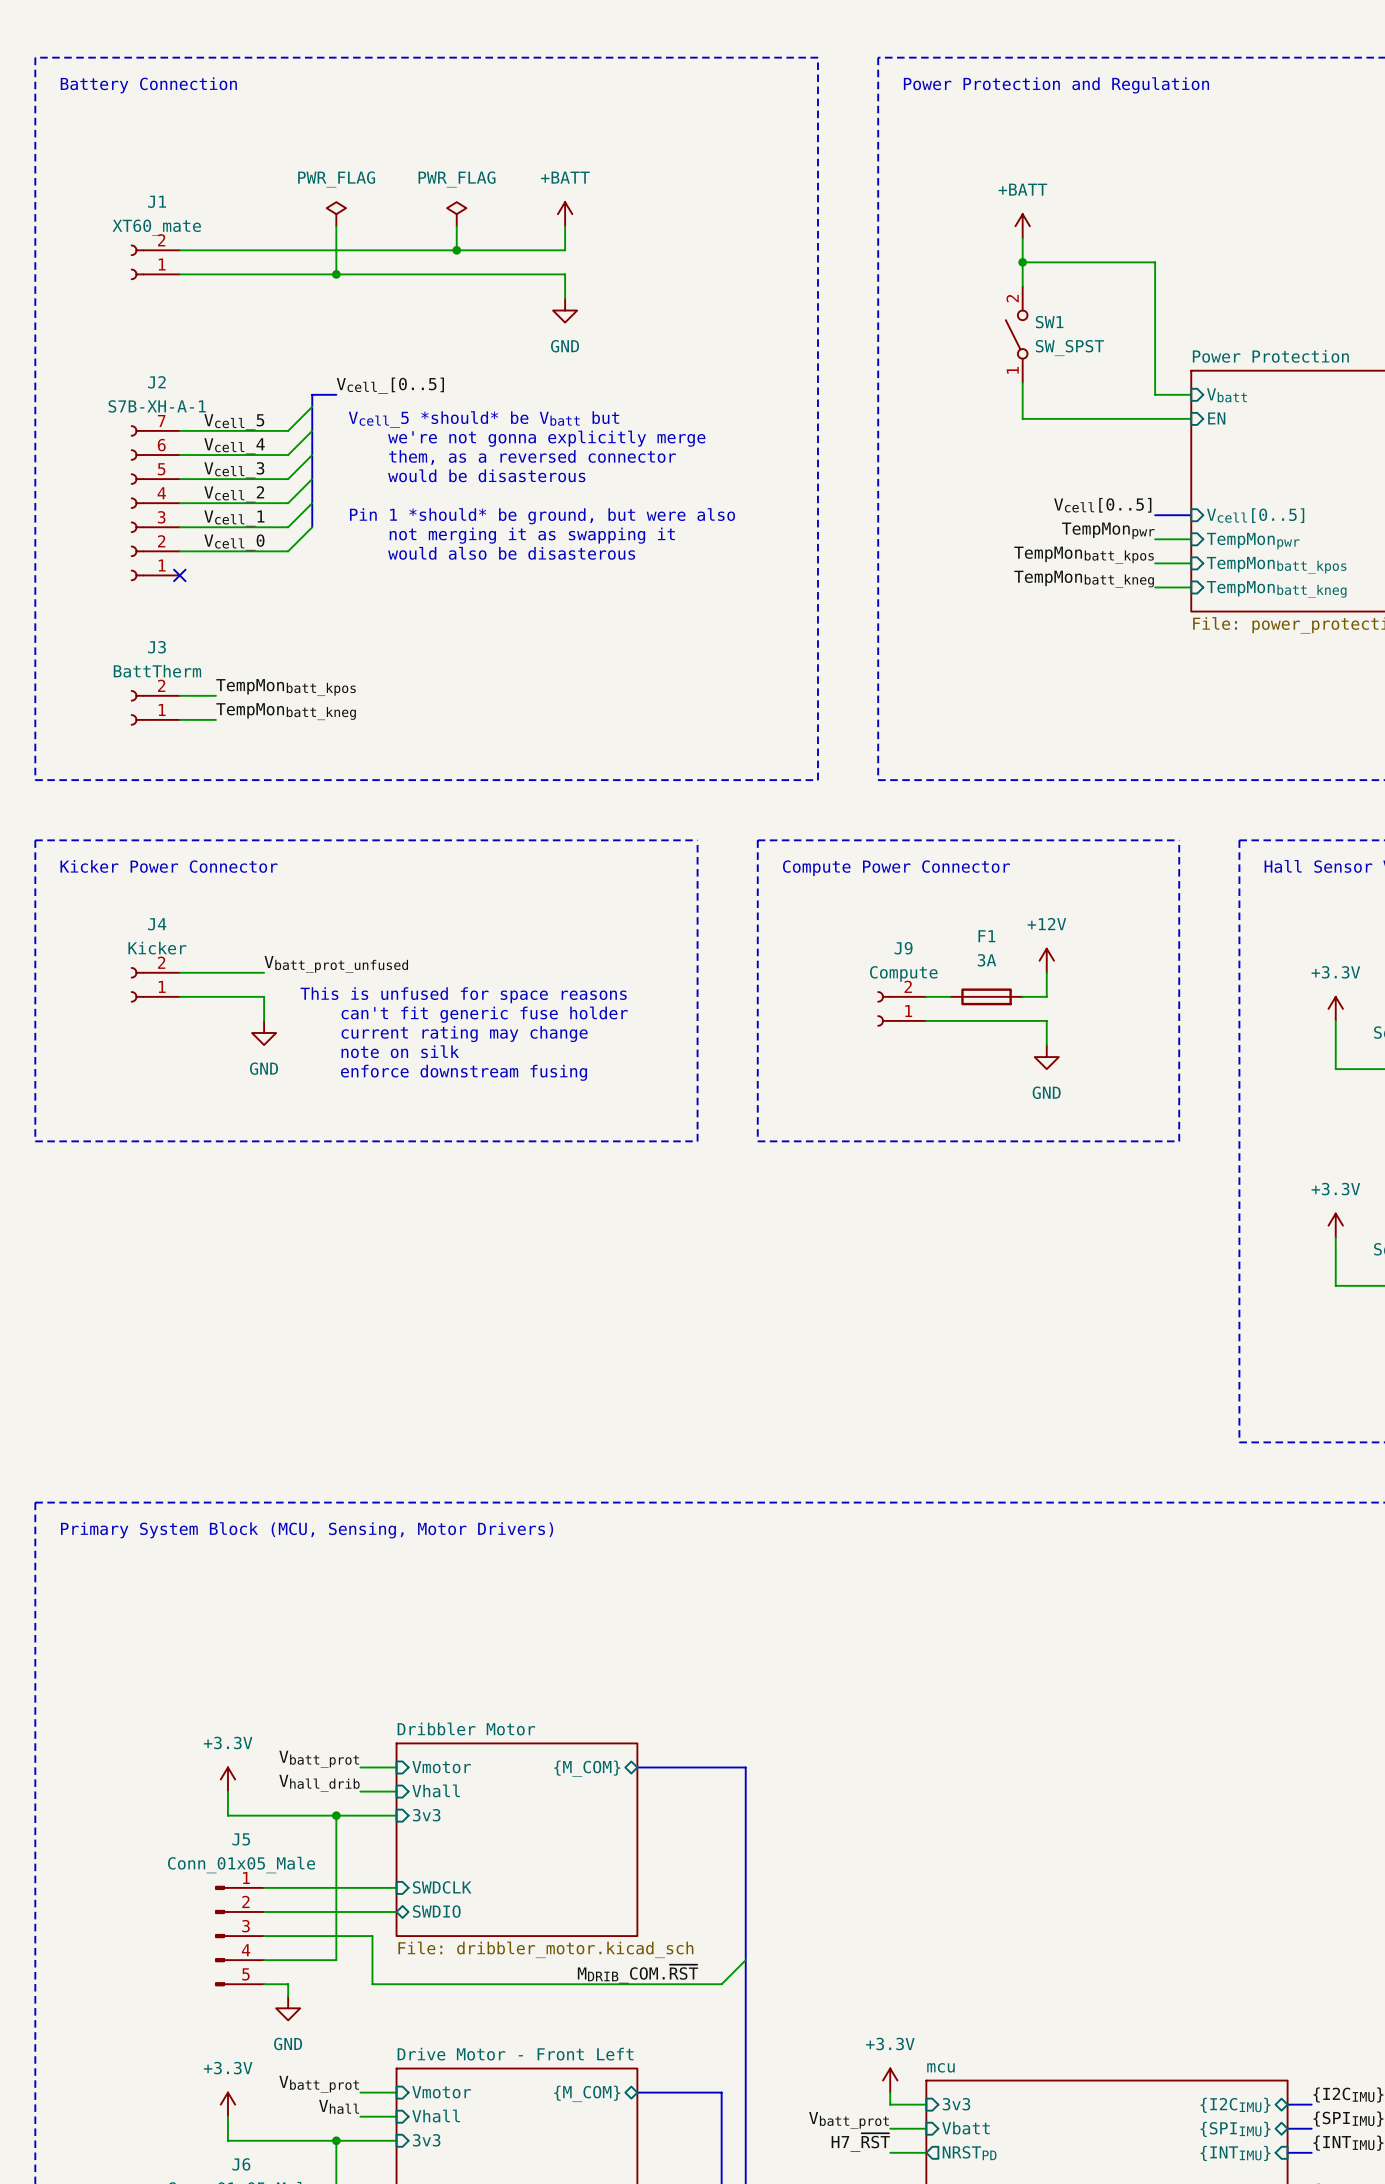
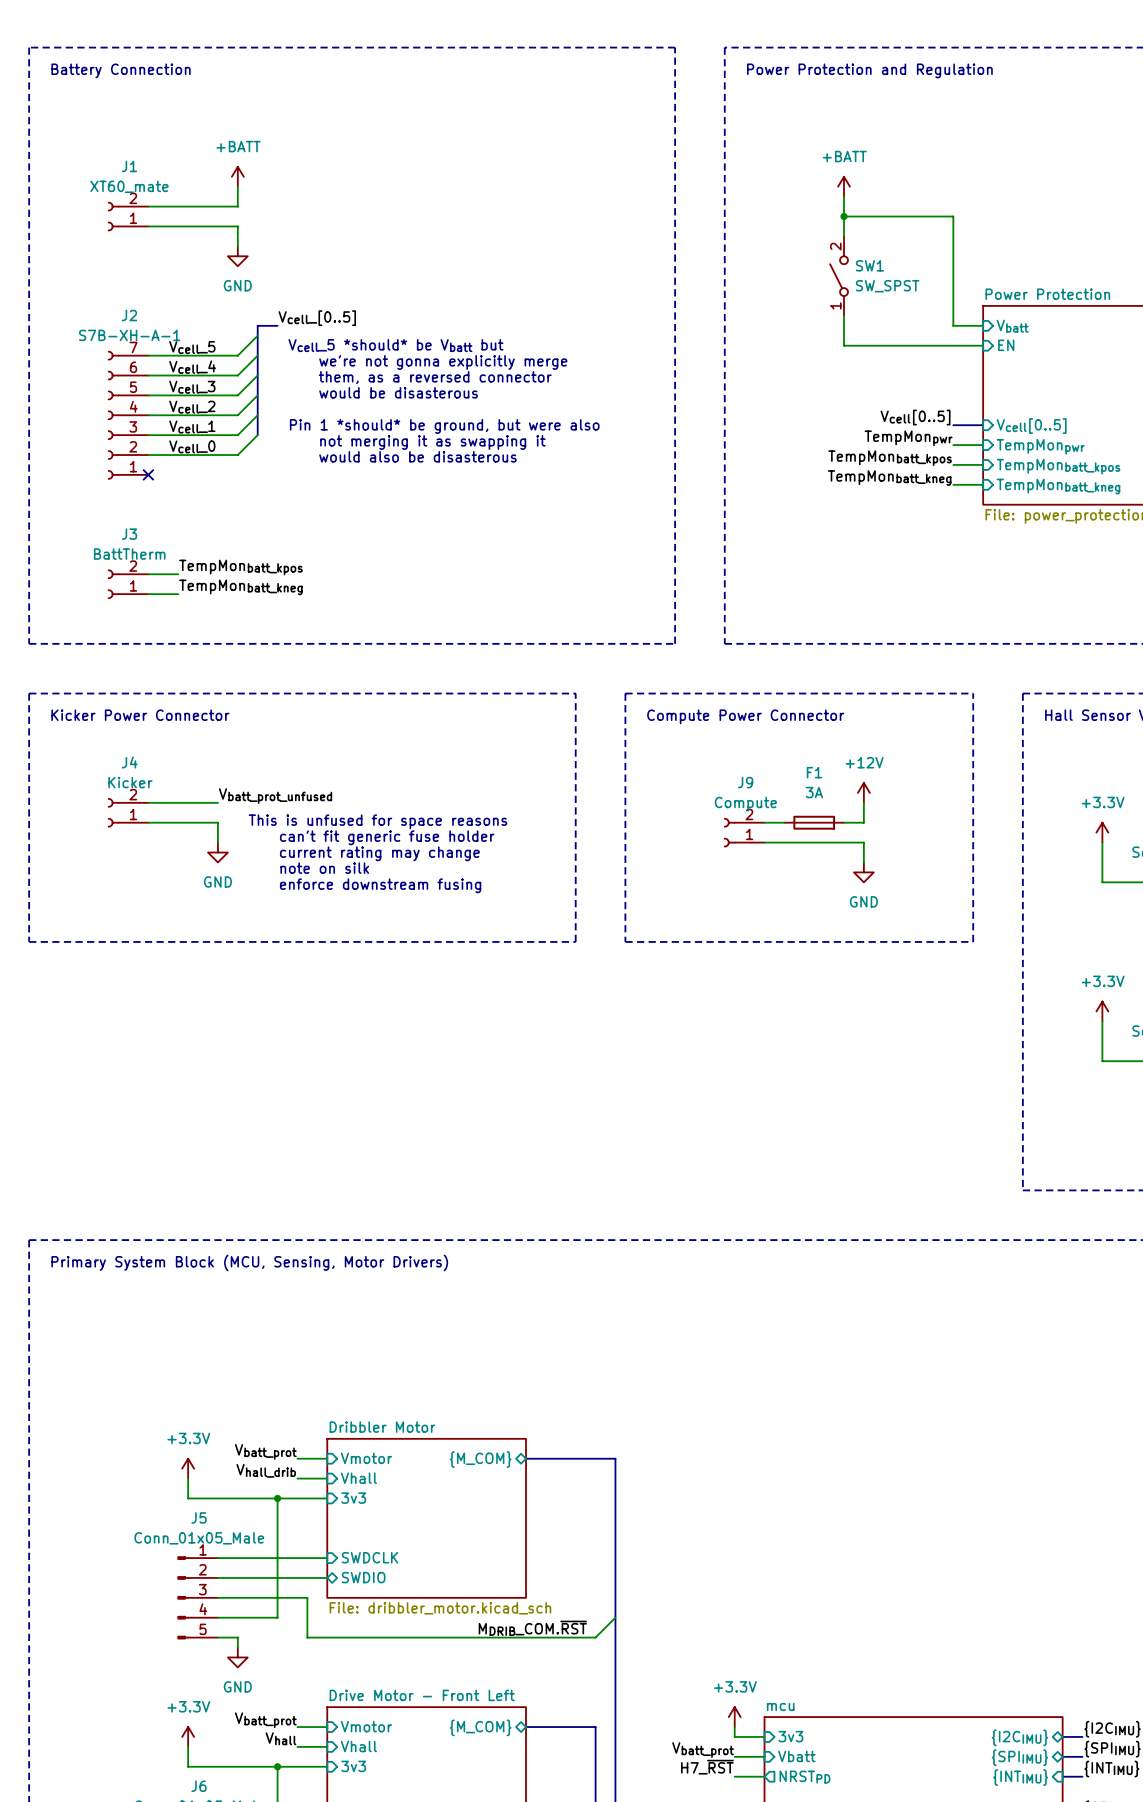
power symbol: none -> +BATT (237, 176)
power symbol: PWR_FLAG (336, 214) -> none
power symbol: PWR_FLAG (456, 214) -> none
power symbol: +BATT (565, 214) -> none
wire: (336, 226) (336, 274) -> none
wire: (456, 226) (456, 250) -> none
wire: (565, 226) (565, 250) (288, 250) -> (237, 186) (237, 206)
junction: (456, 250) -> none
wire: (288, 274) (565, 274) (565, 298) -> (237, 226) (237, 246)
junction: (336, 274) -> none
power symbol: none -> GND (237, 256)
power symbol: GND (565, 310) -> none

